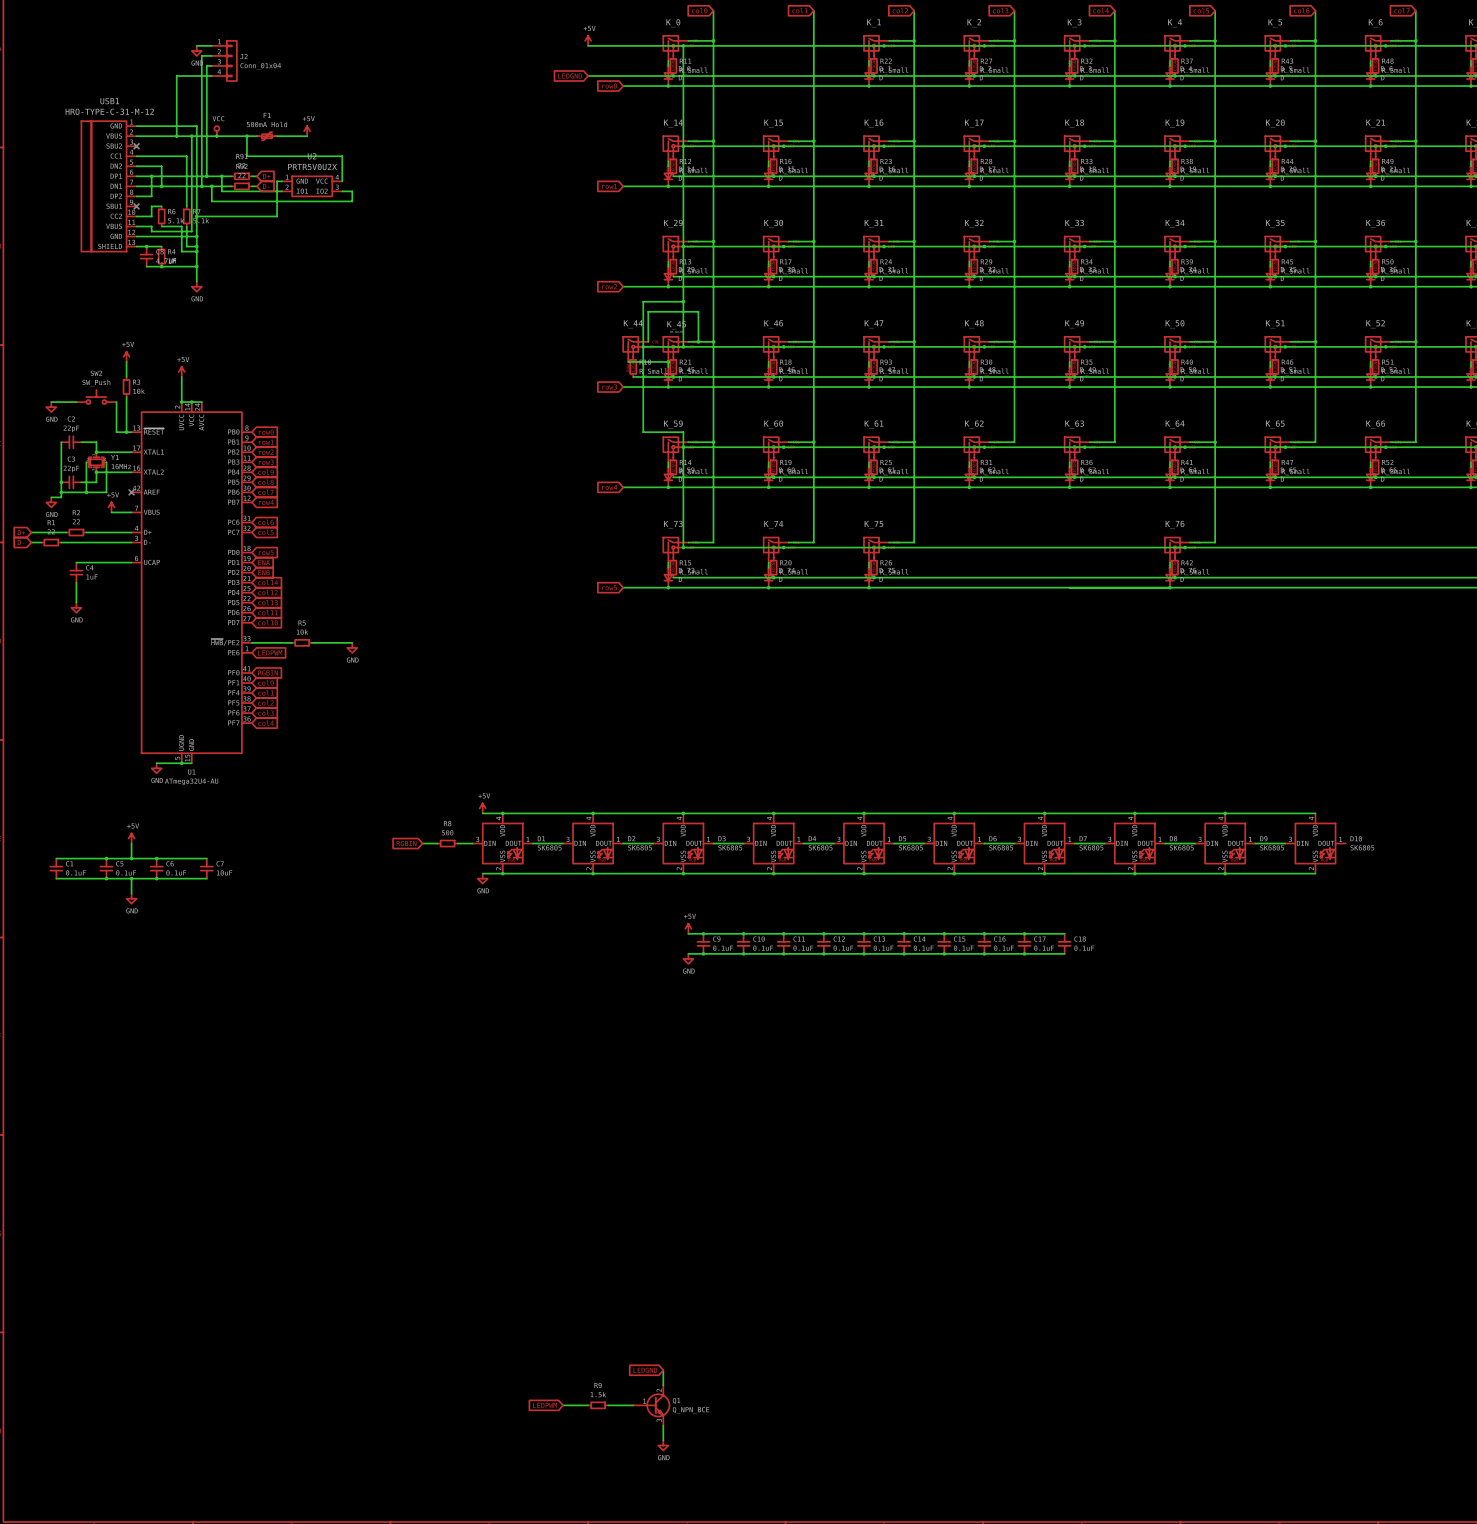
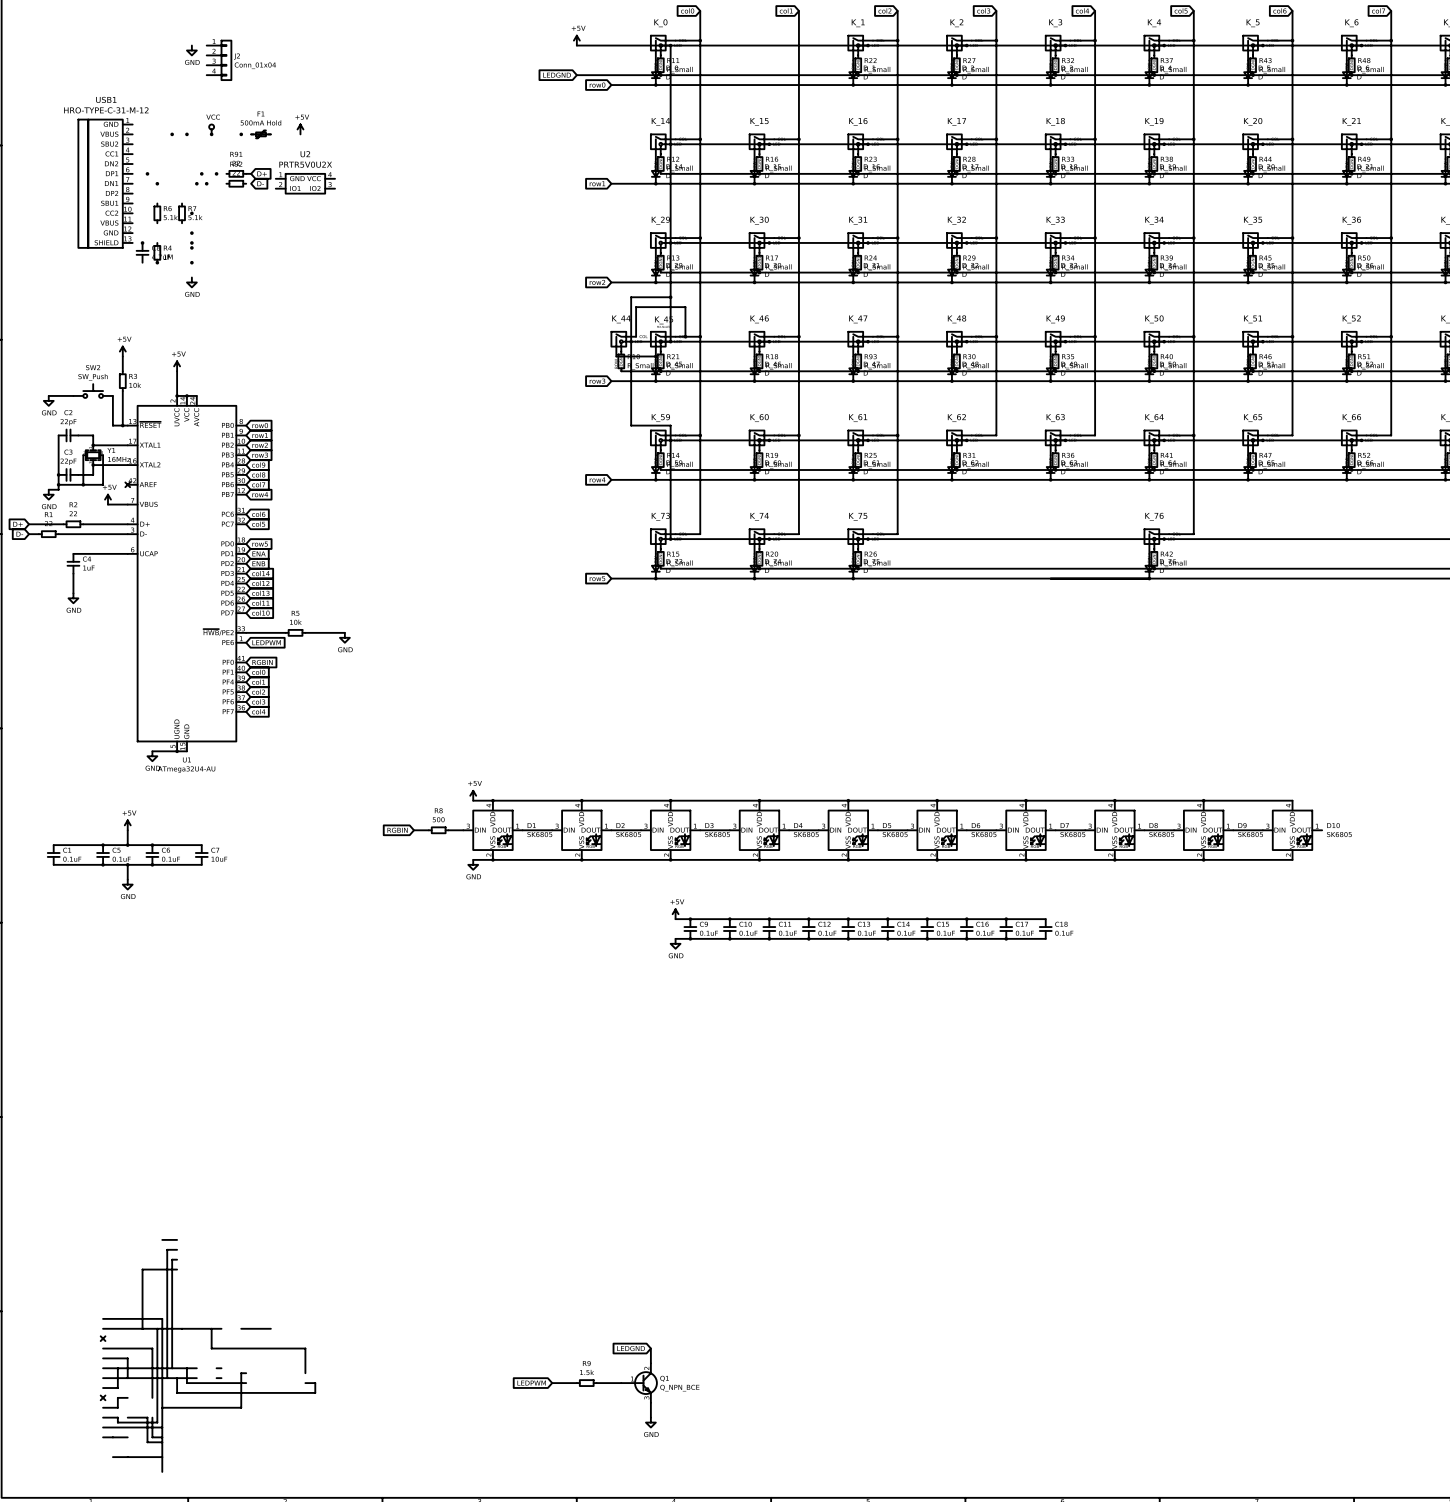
wire: (196, 45) (211, 45) -> none
wire: (211, 55) (201, 55) (201, 186) -> none
wire: (211, 65) (206, 65) (206, 176) -> none
wire: (211, 76) (176, 76) (176, 136) -> none
wire: (136, 126) (196, 126) (196, 281) -> none
wire: (136, 136) (256, 136) -> none
wire: (191, 136) (191, 231) (151, 231) (151, 226) (136, 226) -> none
wire: (246, 136) (246, 156) (342, 156) (342, 181) -> none
wire: (277, 136) (307, 136) -> none
no-connect mark: (136, 146) -> none
wire: (136, 156) (186, 156) (186, 206) -> none
wire: (136, 166) (161, 166) (161, 186) -> none
wire: (136, 176) (231, 176) -> none
wire: (151, 176) (151, 196) (136, 196) -> none
wire: (221, 176) (221, 191) (282, 191) -> none
wire: (282, 181) (277, 181) (277, 216) (196, 216) -> none
wire: (136, 186) (231, 186) -> none
wire: (211, 186) (211, 201) (352, 201) (352, 191) (342, 191) -> none
wire: (251, 186) (256, 186) -> none
no-connect mark: (136, 206) -> none
wire: (161, 206) (151, 206) (151, 216) (136, 216) -> none
wire: (161, 226) (181, 226) (181, 251) (196, 251) -> none
wire: (186, 226) (186, 246) (196, 246) -> none
wire: (136, 236) (196, 236) -> none
wire: (136, 246) (161, 246) -> none
wire: (146, 266) (196, 266) -> none
wire: none -> (162, 1239) (177, 1239)
wire: none -> (177, 1249) (167, 1249) (167, 1378)
wire: none -> (177, 1259) (172, 1259) (172, 1368)
wire: none -> (177, 1269) (142, 1269) (142, 1328)
wire: none -> (103, 1318) (162, 1318) (162, 1471)
wire: none -> (103, 1328) (221, 1328)
wire: none -> (157, 1328) (157, 1422) (117, 1422) (117, 1417) (103, 1417)
wire: none -> (211, 1328) (211, 1348) (305, 1348) (305, 1373)
wire: none -> (241, 1328) (270, 1328)
no-connect mark: none -> (103, 1338)
wire: none -> (103, 1348) (152, 1348) (152, 1397)
wire: none -> (103, 1358) (127, 1358) (127, 1378)
wire: none -> (103, 1368) (196, 1368)
wire: none -> (117, 1368) (117, 1388) (103, 1388)
wire: none -> (186, 1368) (186, 1383) (246, 1383)
wire: none -> (216, 1368) (221, 1368)
wire: none -> (246, 1373) (241, 1373) (241, 1407) (162, 1407)
wire: none -> (103, 1378) (196, 1378)
wire: none -> (177, 1378) (177, 1392) (315, 1392) (315, 1383) (305, 1383)
wire: none -> (216, 1378) (221, 1378)
no-connect mark: none -> (103, 1397)
wire: none -> (127, 1397) (117, 1397) (117, 1407) (103, 1407)
wire: none -> (127, 1417) (147, 1417) (147, 1442) (162, 1442)
wire: none -> (152, 1417) (152, 1437) (162, 1437)
wire: none -> (103, 1427) (162, 1427)
wire: none -> (103, 1437) (127, 1437)
wire: none -> (112, 1457) (162, 1457)

